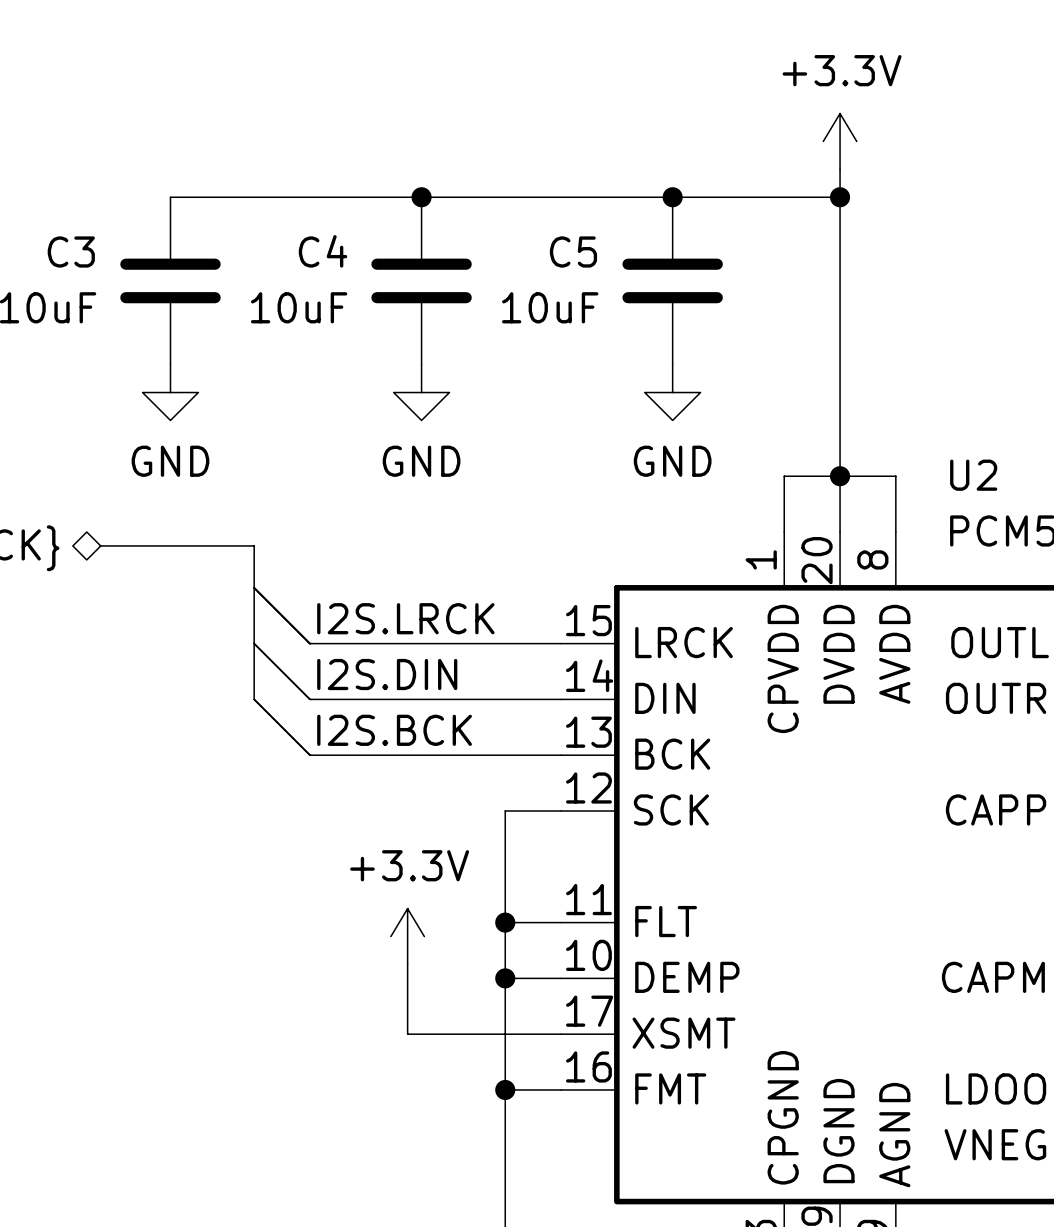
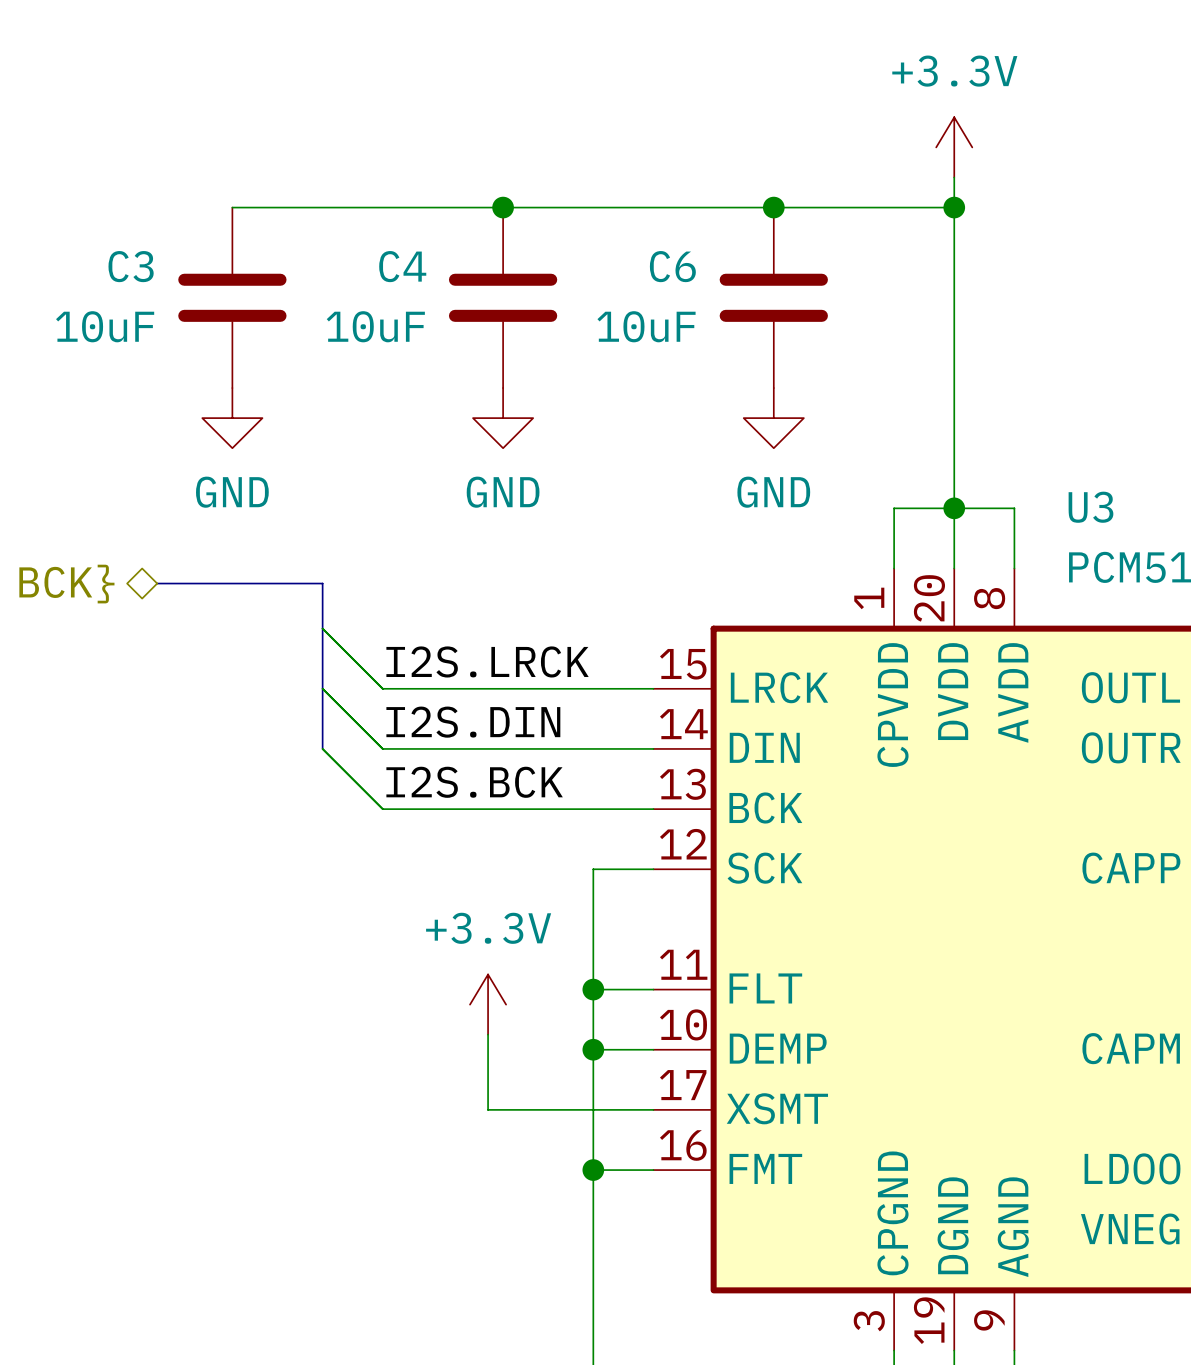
C5 name: C5 (573, 252) -> C6 (672, 266)
U2 name: U2 (973, 475) -> U3 (1090, 507)

